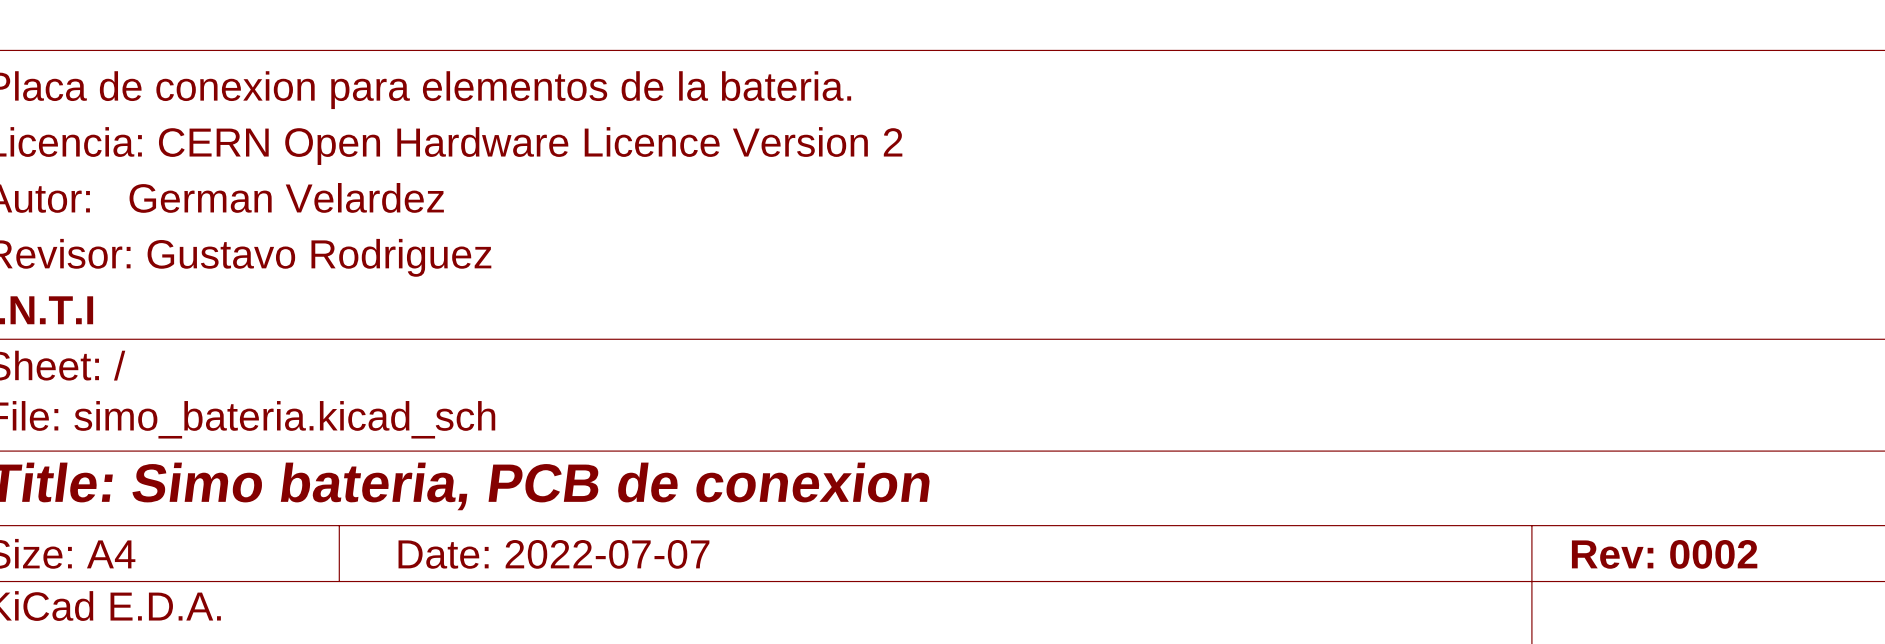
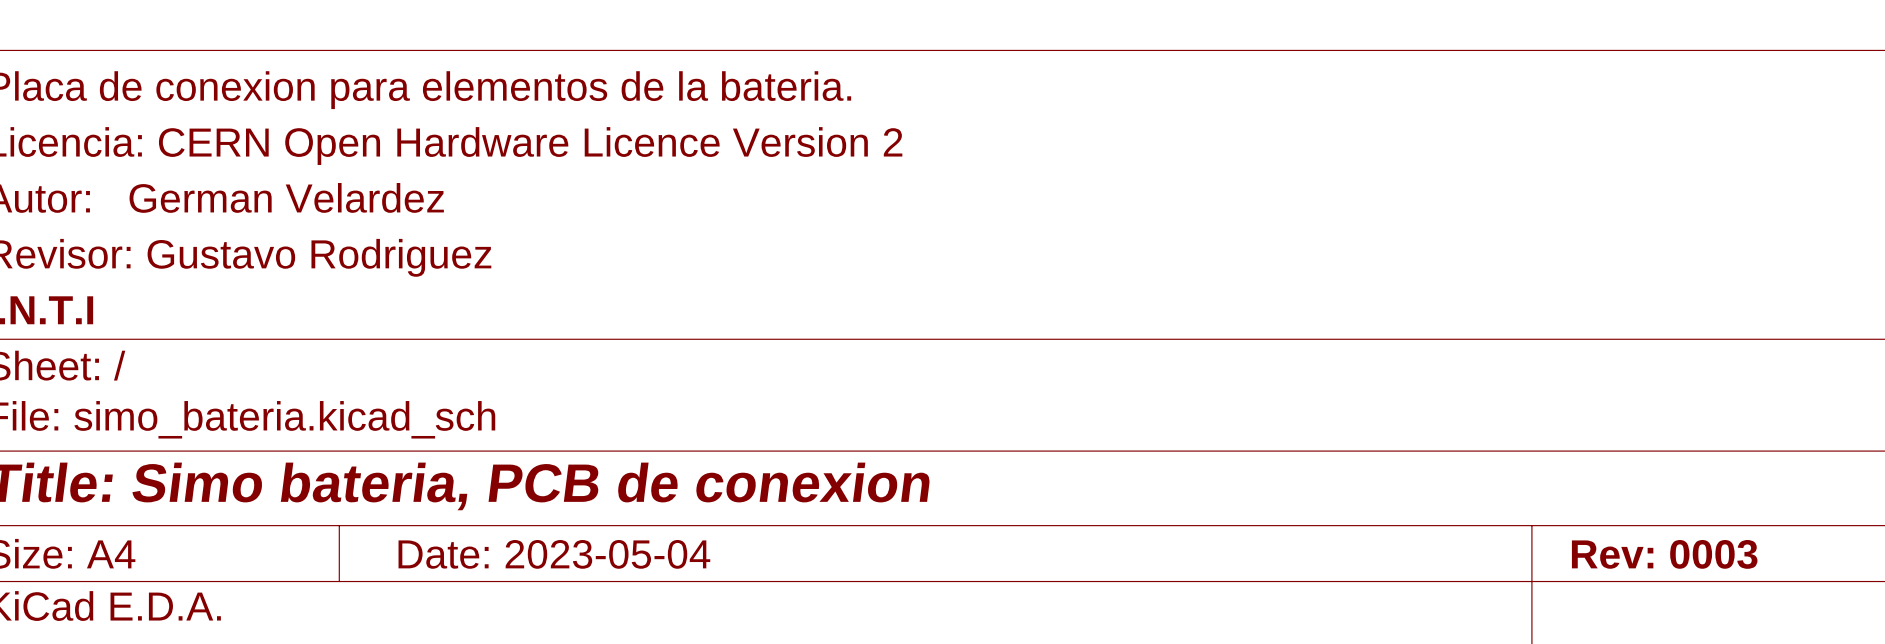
title block: Date: 2022-07-07 (553, 554) -> Date: 2023-05-04 (554, 554)
title block: Rev: 0002 (1664, 554) -> Rev: 0003 (1664, 554)

